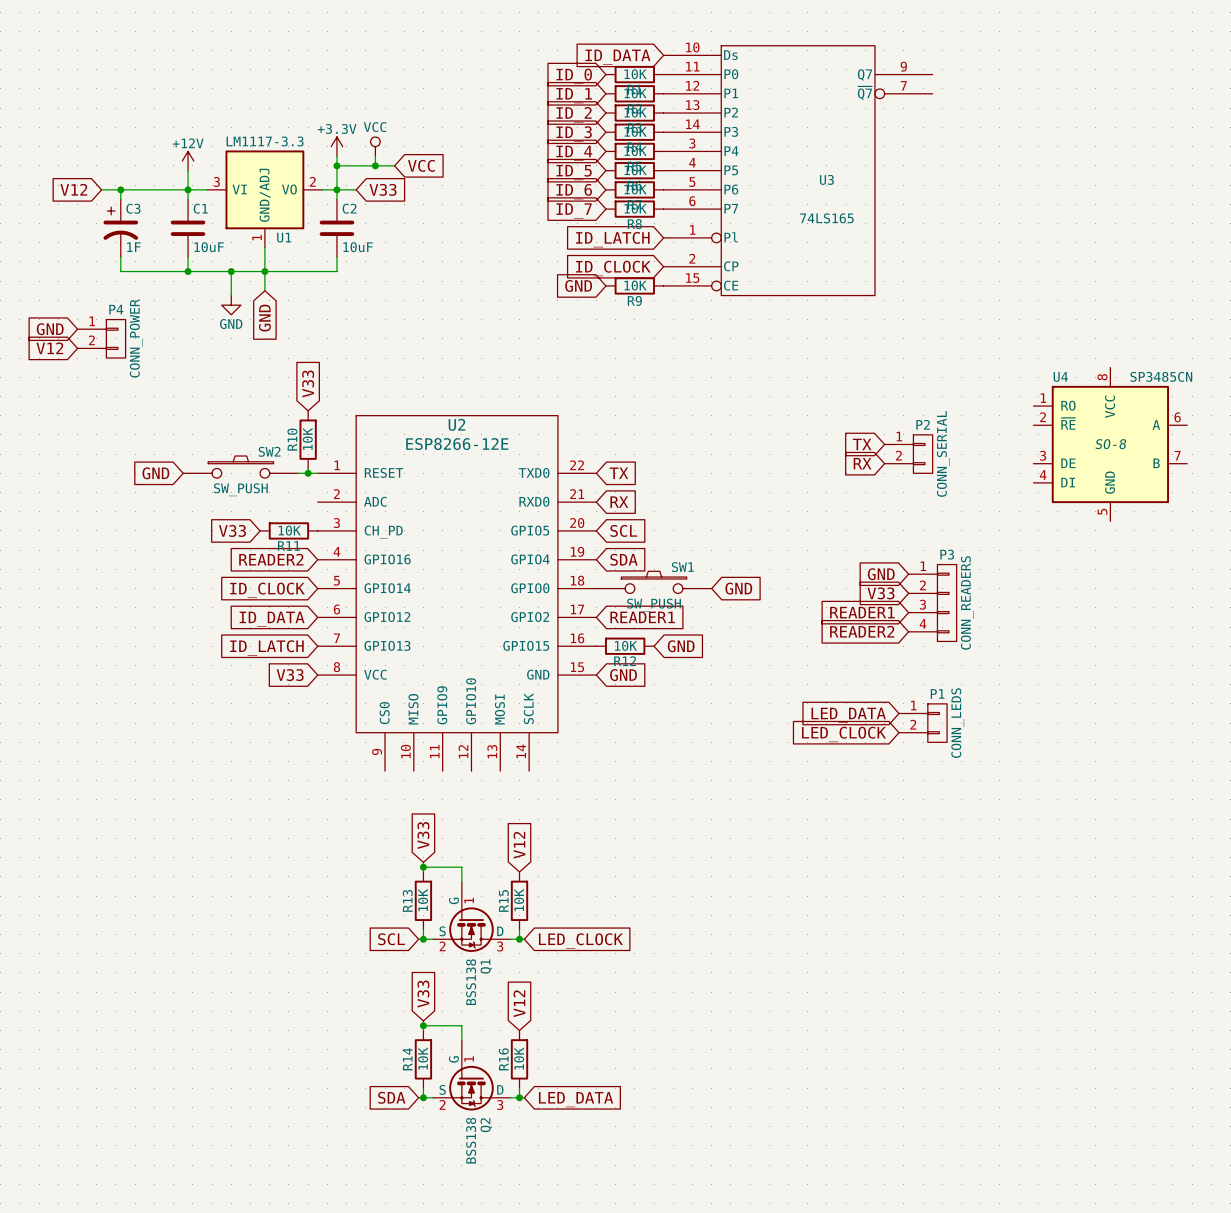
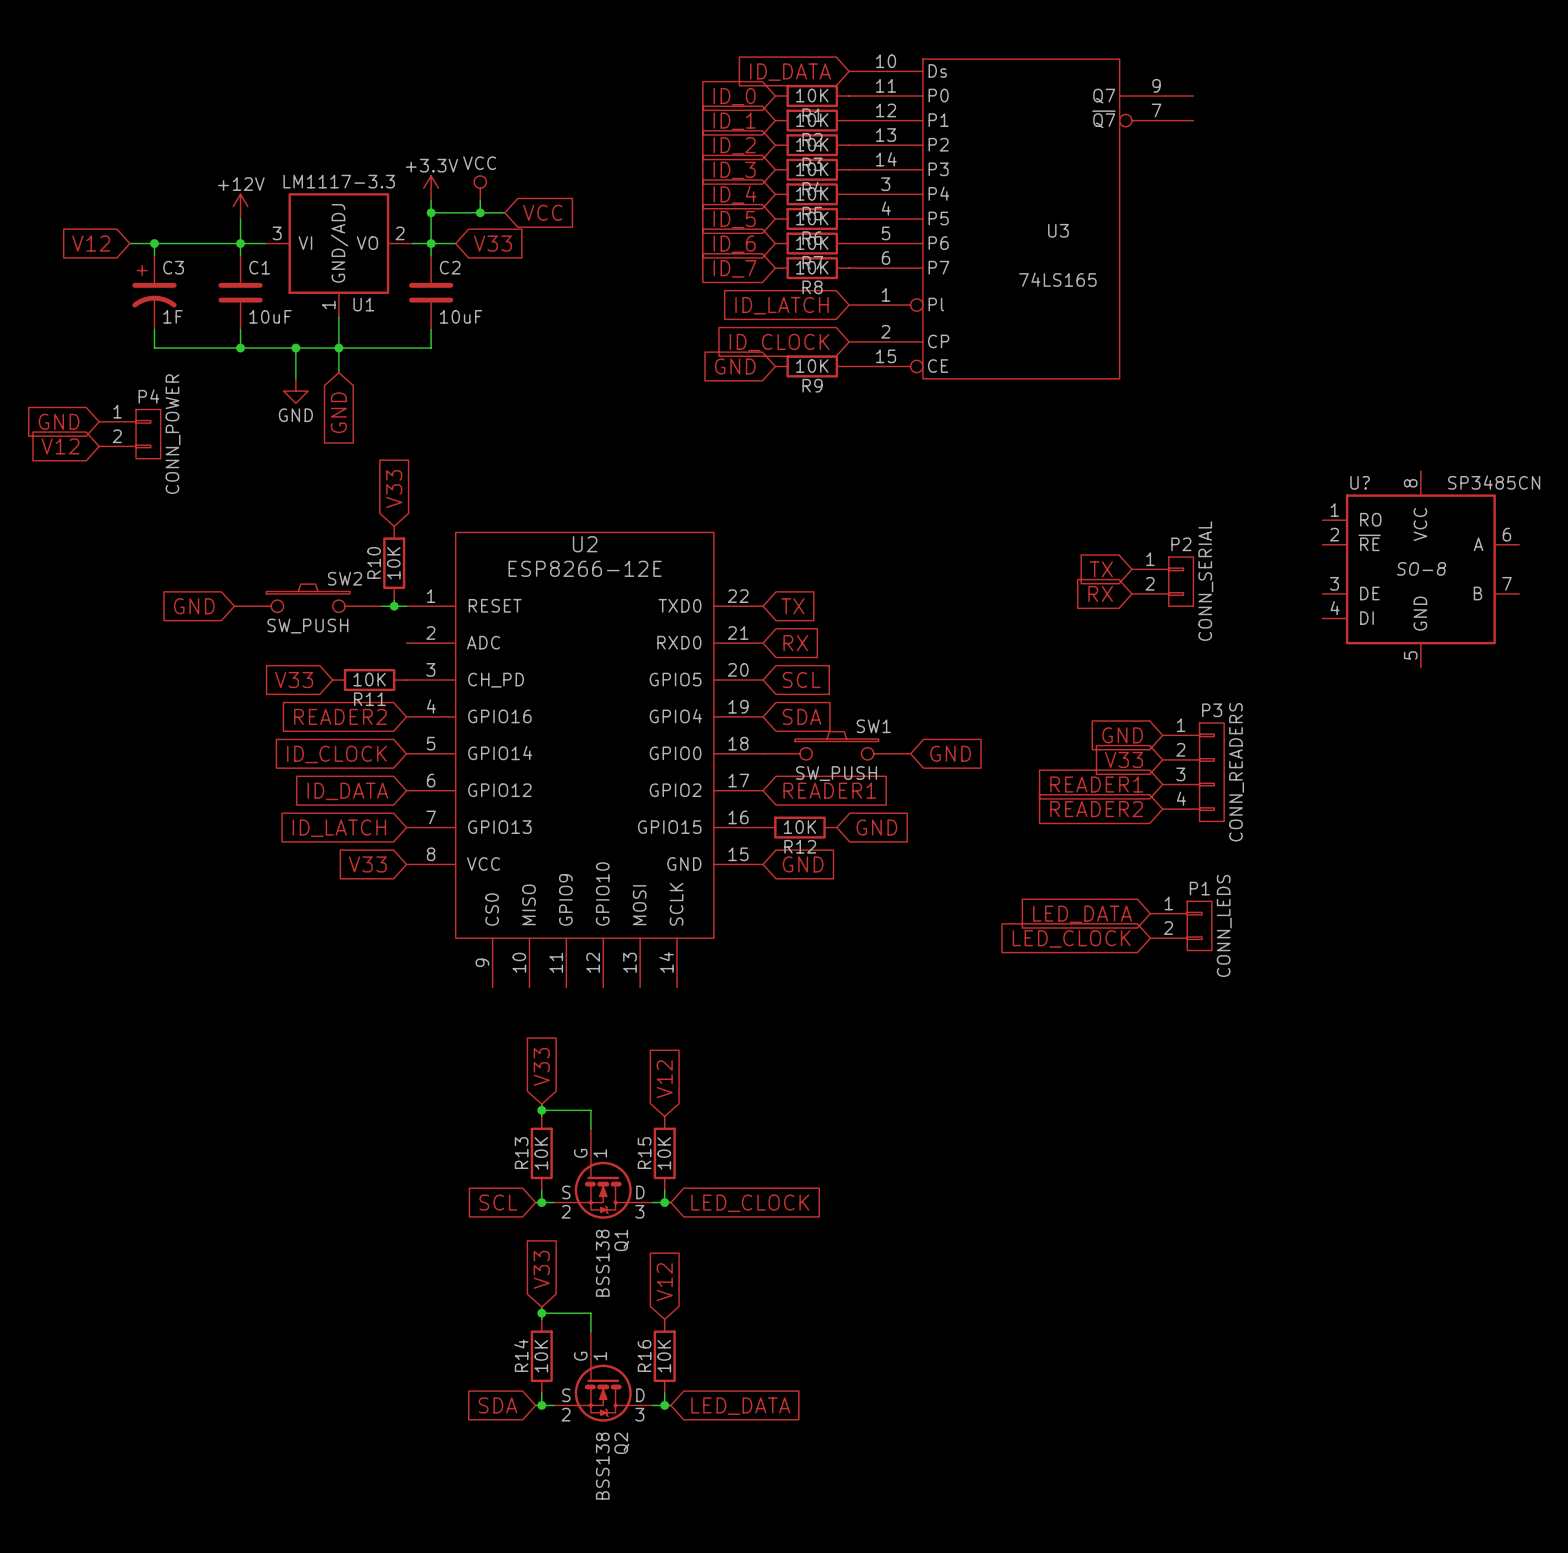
U4 name: U4 (1060, 376) -> U? (1360, 482)

